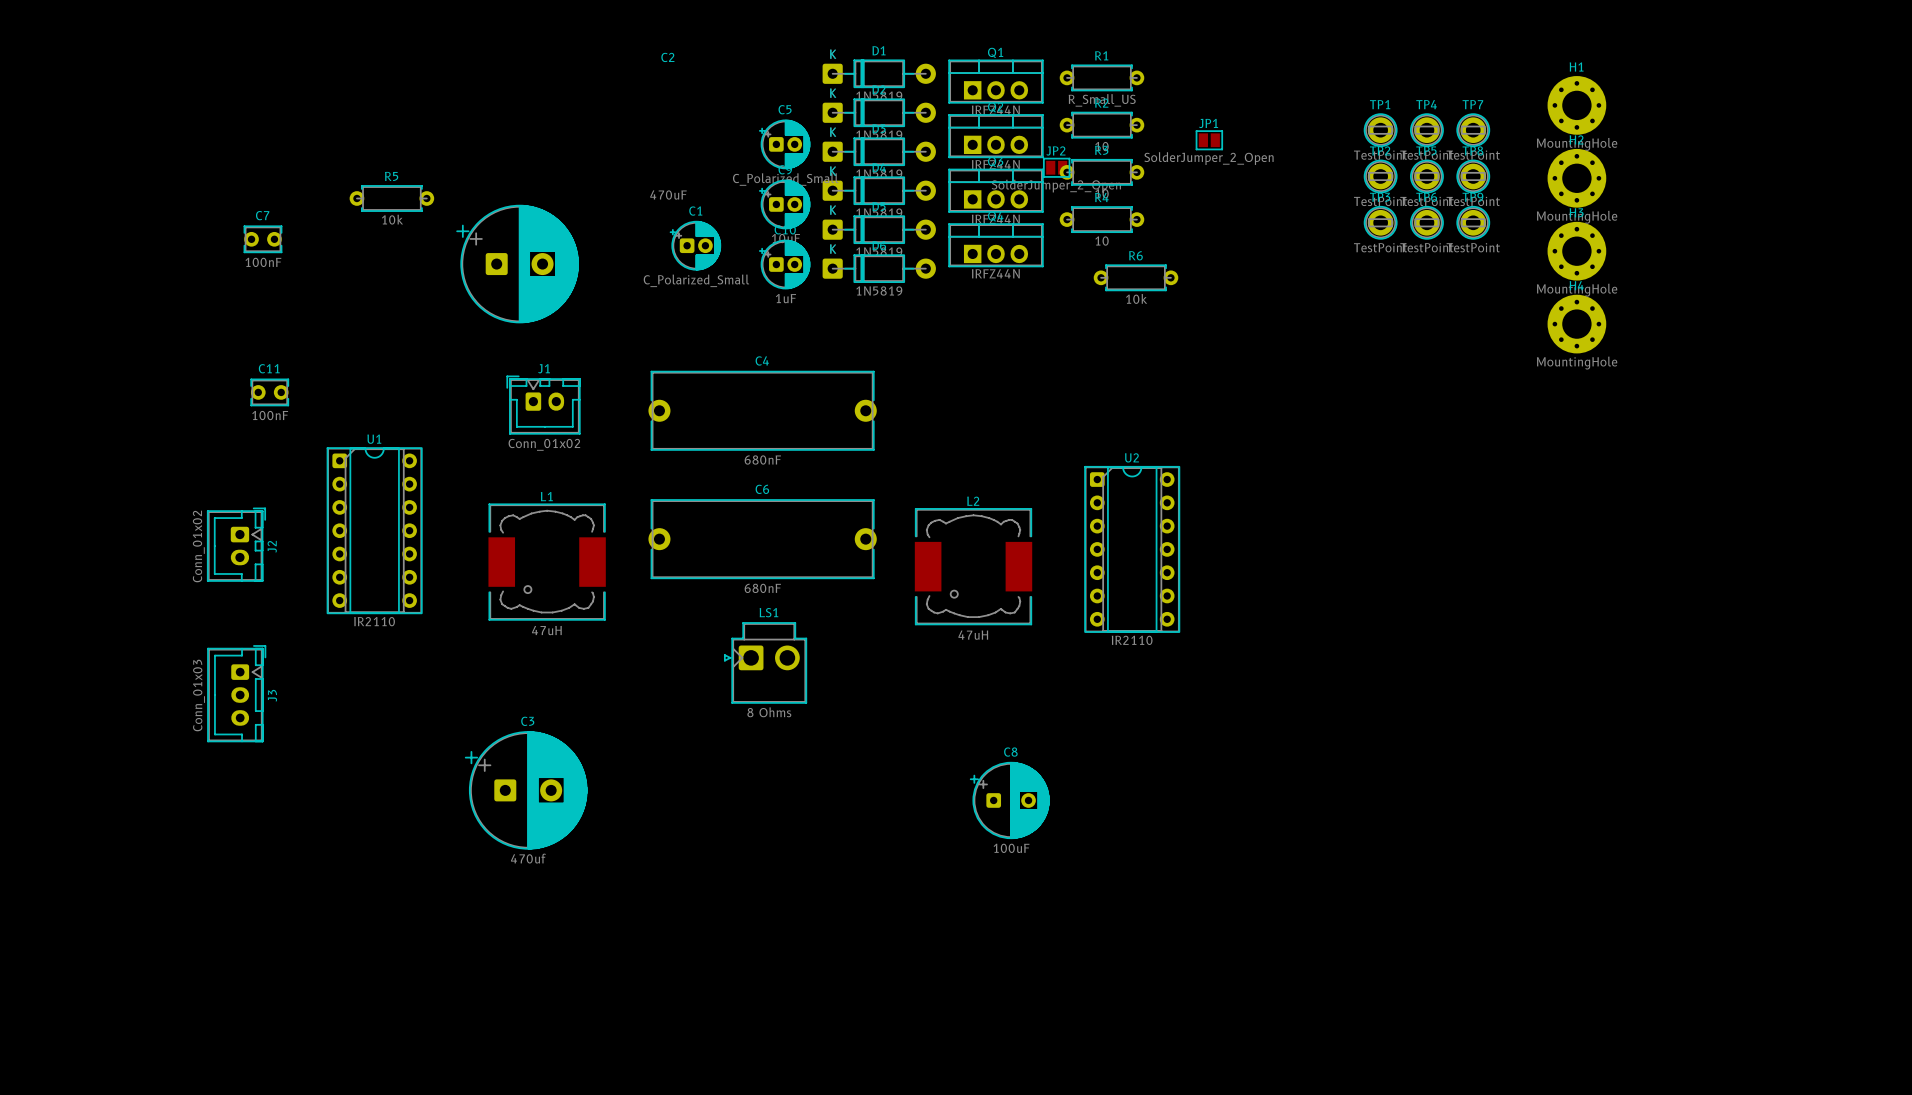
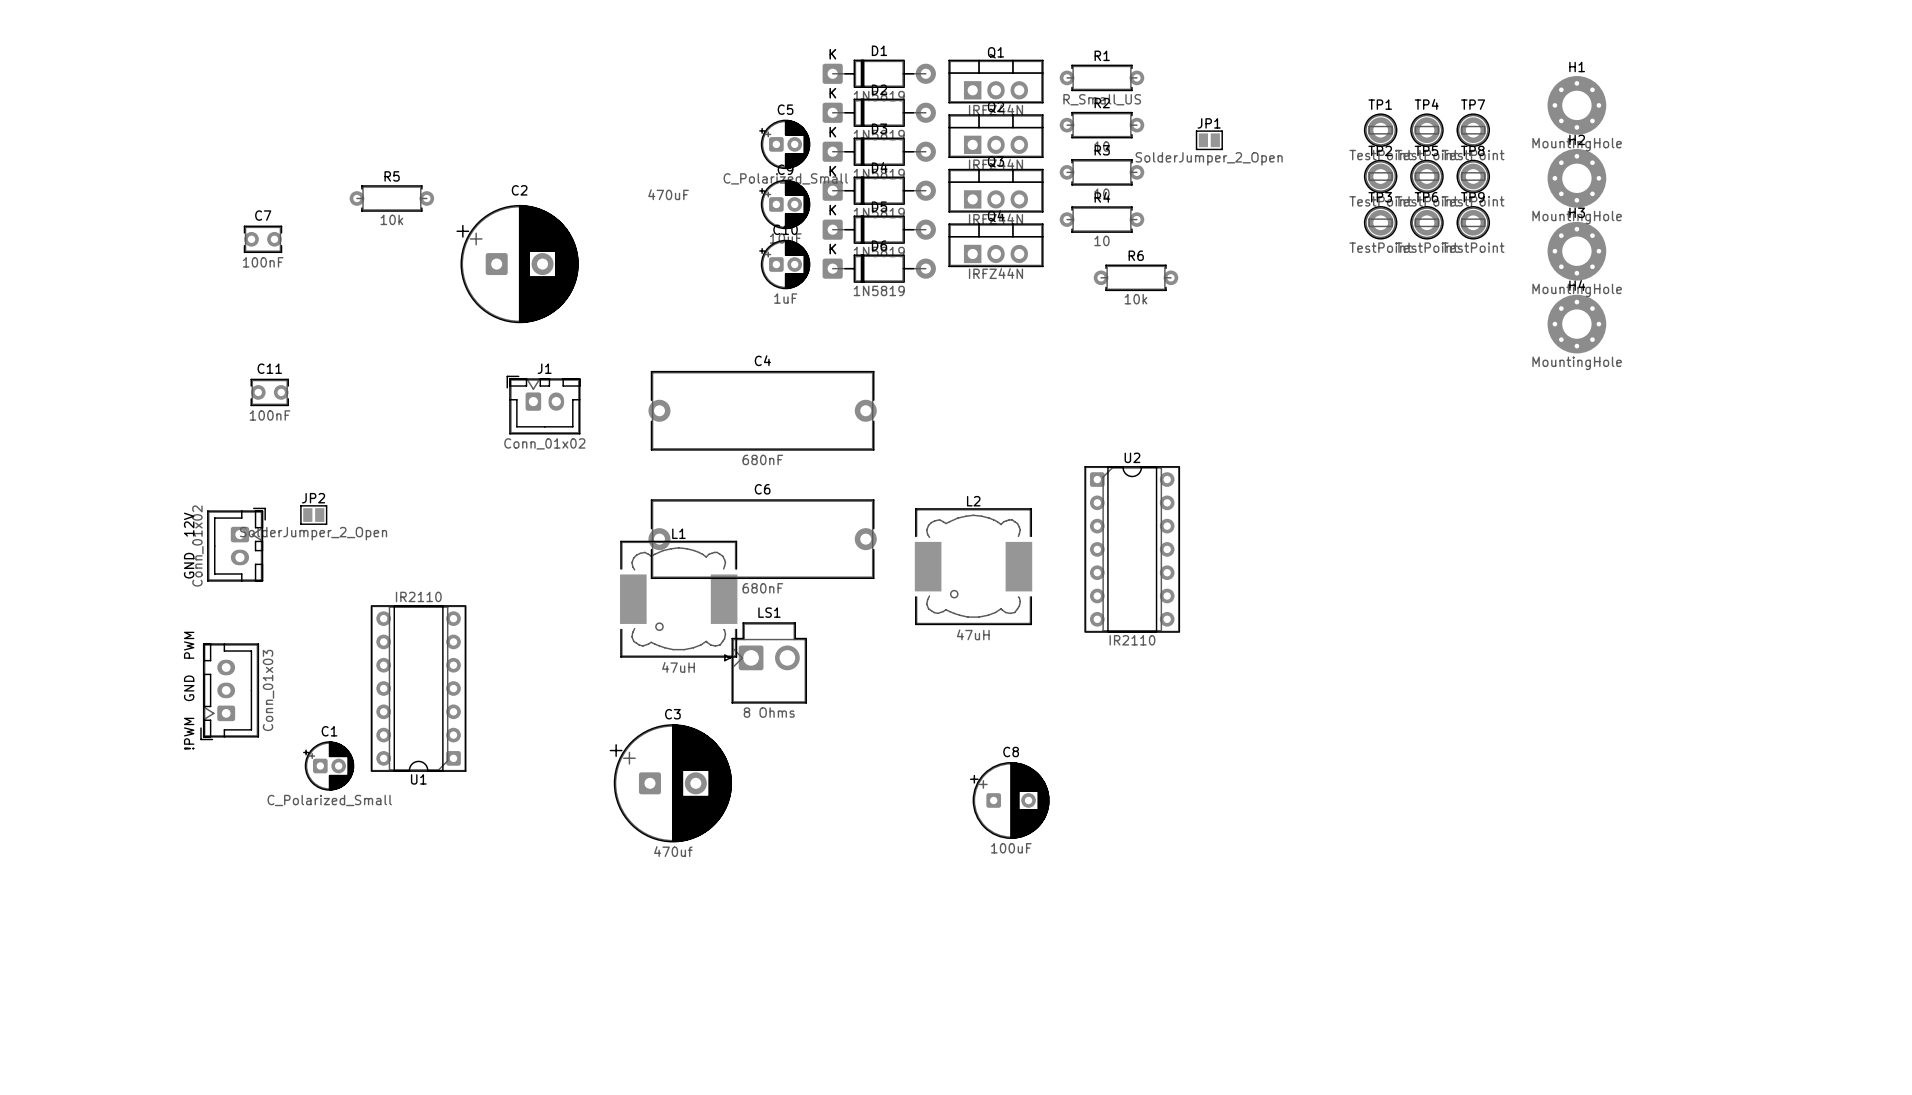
C2 name position: C2 (667, 57) -> C2 (519, 190)
JP2 position: (1056, 167) -> (313, 515)
C1 position: (695, 245) -> (328, 766)
U1 rotation: 0° (374, 530) -> 180° (418, 688)
U1 position: (374, 530) -> (418, 688)
J2 name: J2 (272, 546) -> GND 12V (189, 545)
L1 position: (547, 562) -> (678, 599)
!PWM GND PWM: none -> Conn_01x03 (229, 691)
J3: Conn_01x03 (236, 693) -> none
C3 position: (526, 790) -> (670, 783)

